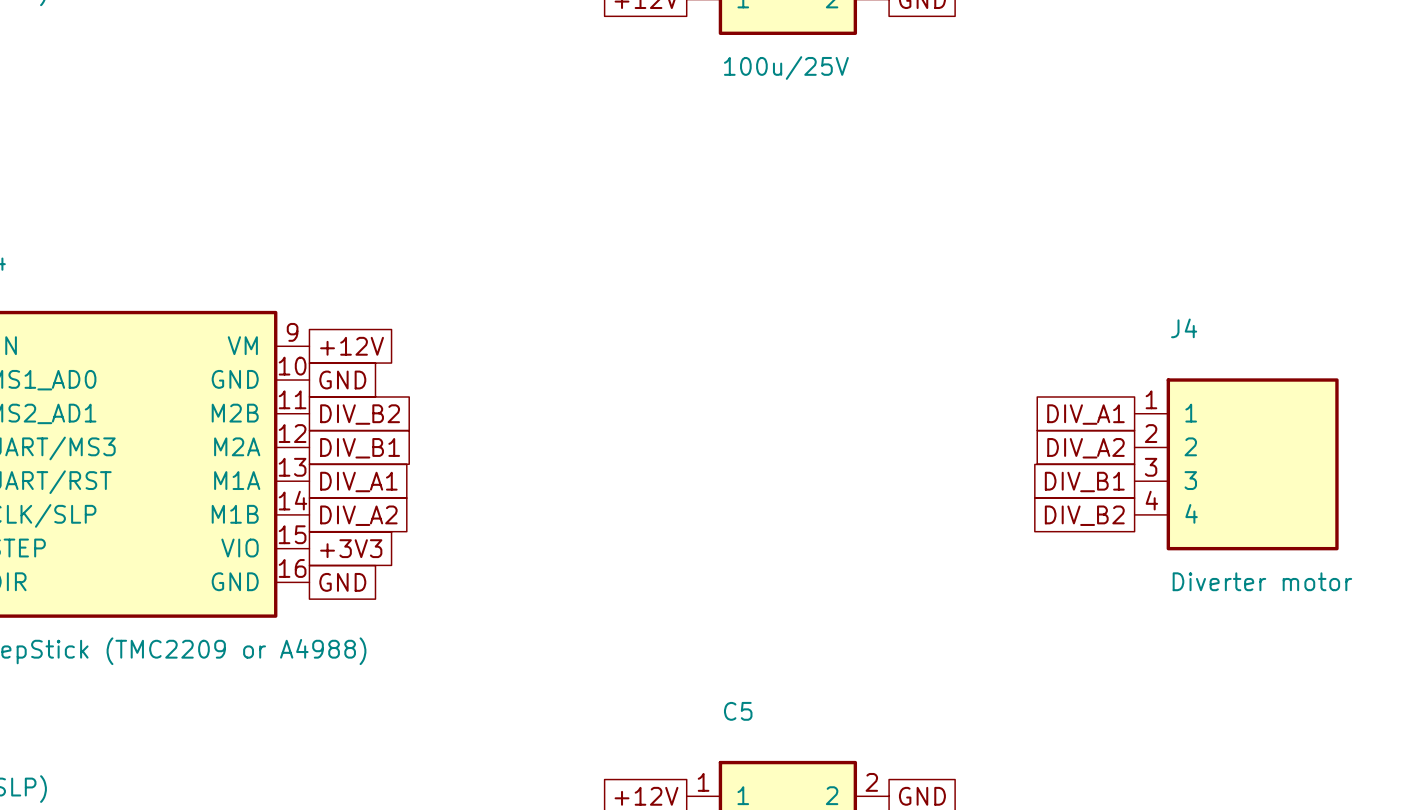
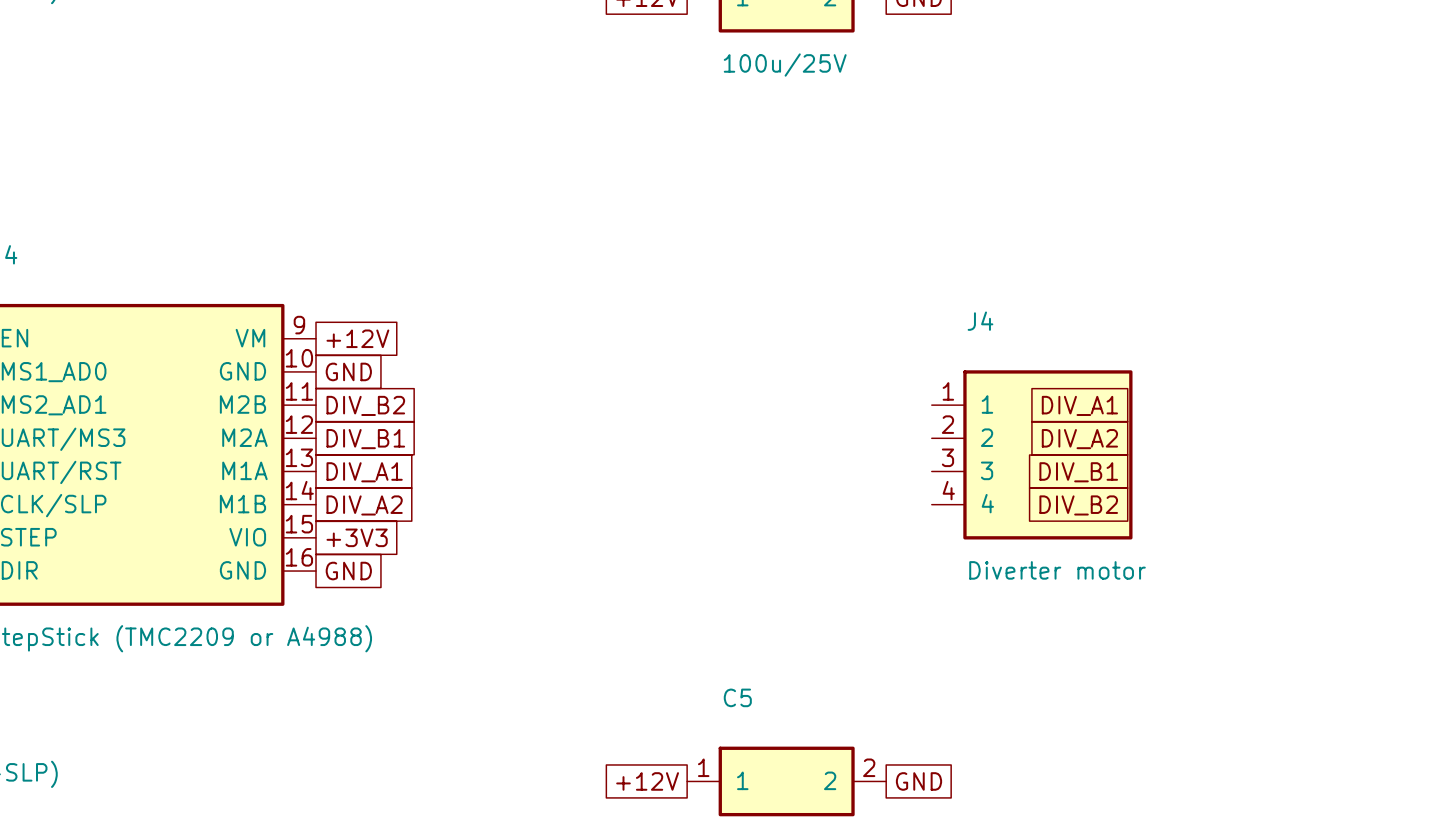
J4 position: (1236, 464) -> (1032, 454)

